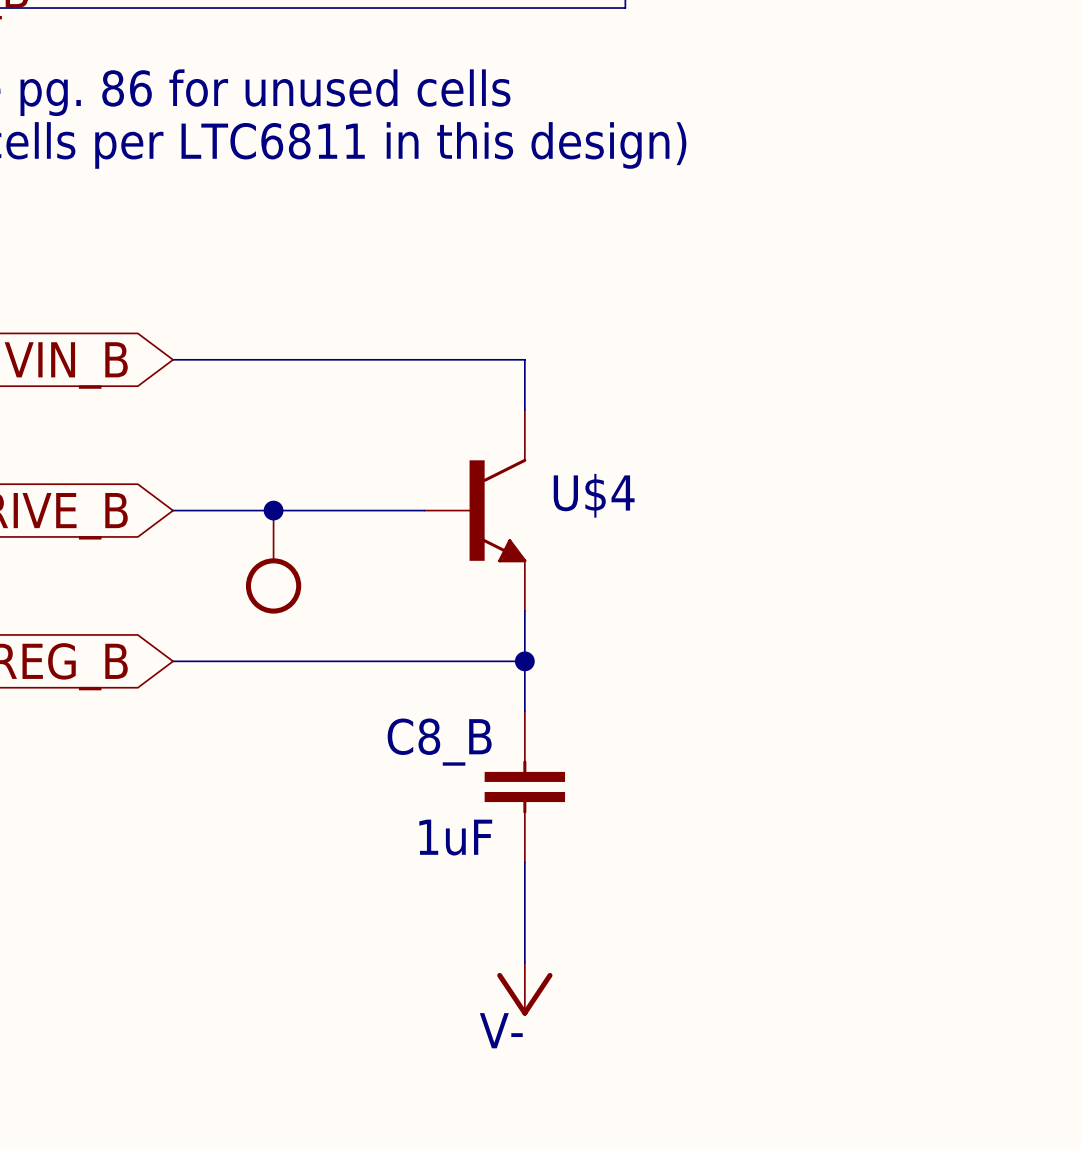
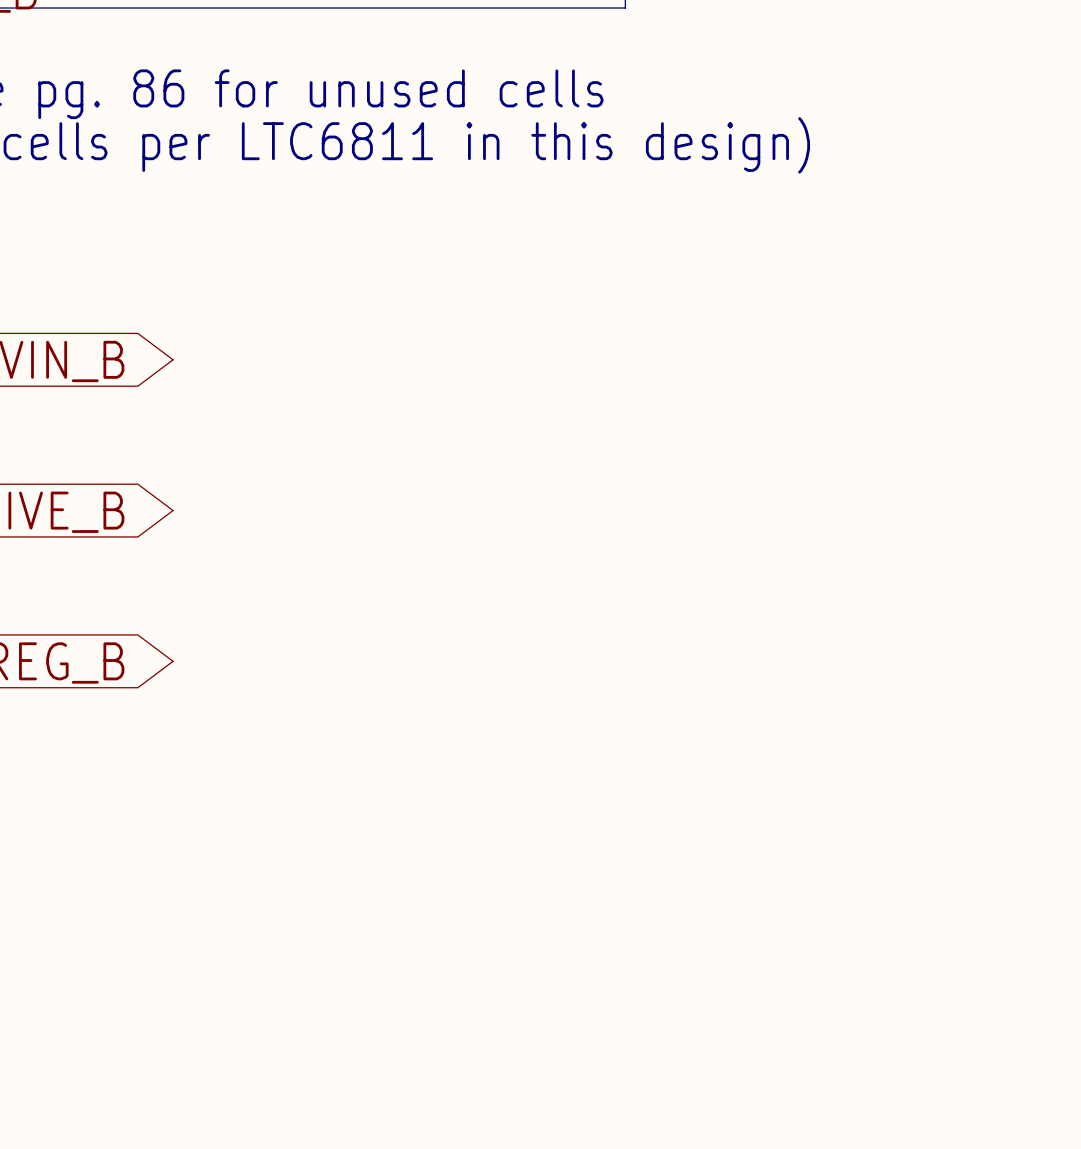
wire: (173, 359) (524, 359) (524, 410) -> none
wire: (173, 510) (424, 510) -> none
junction: (273, 510) -> none
U$4: (475, 510) -> none
part: (273, 562) -> none
wire: (524, 611) (524, 711) -> none
wire: (173, 661) (524, 661) -> none
junction: (524, 661) -> none
C8_B: 1uF (524, 786) -> none
wire: (524, 862) (524, 962) -> none
power symbol: V- (524, 989) -> none

